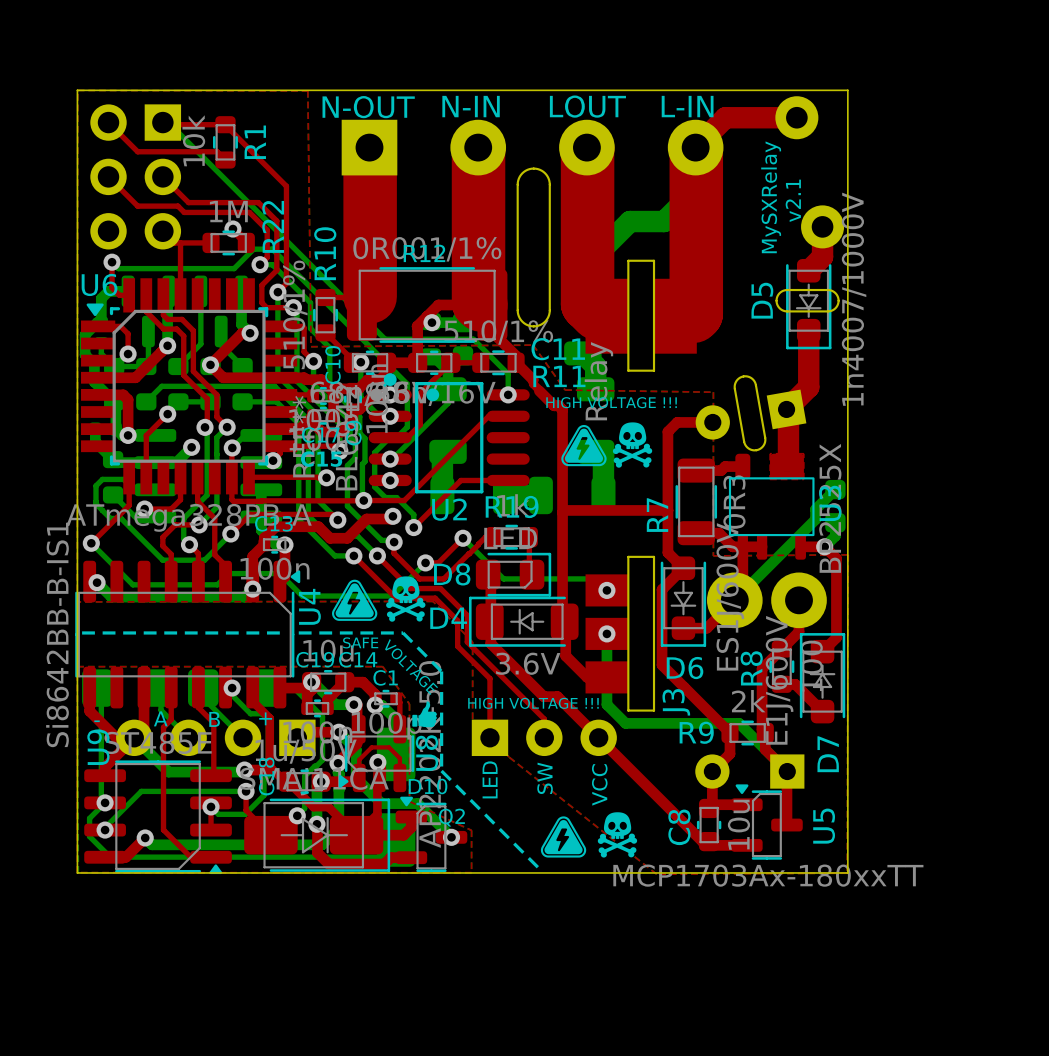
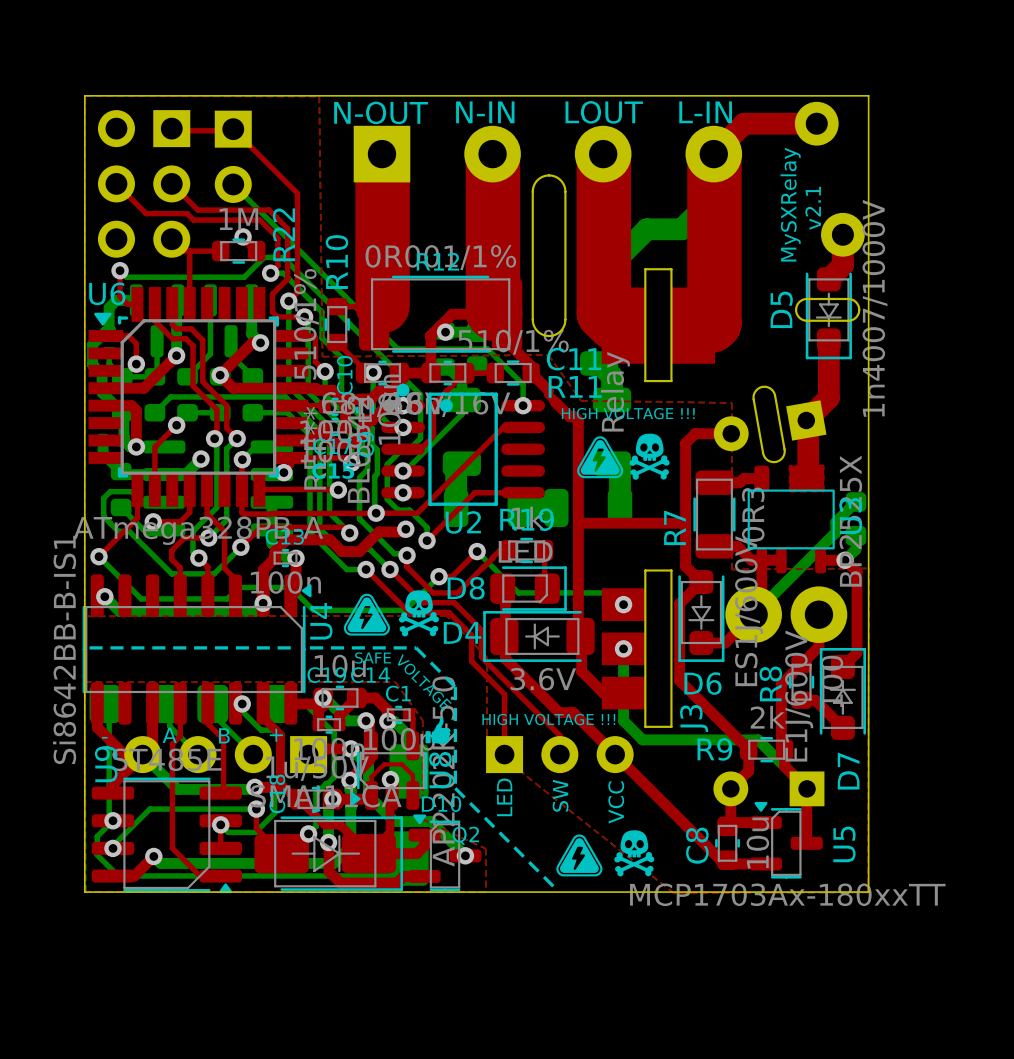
top track: (108, 122) (137, 151) (217, 151) (225, 160) -> none
bottom track: (162, 122) (168, 122) (223, 177) -> none
R1: 10k (225, 142) -> none
part: none -> (233, 156)

